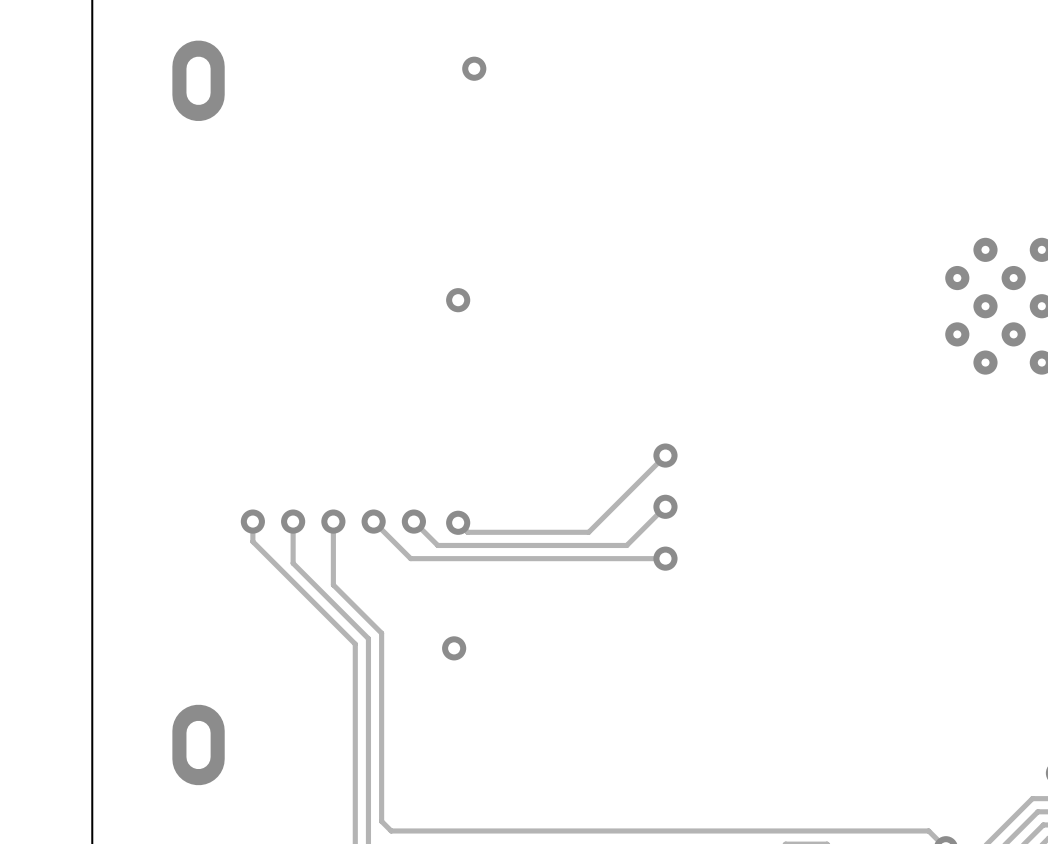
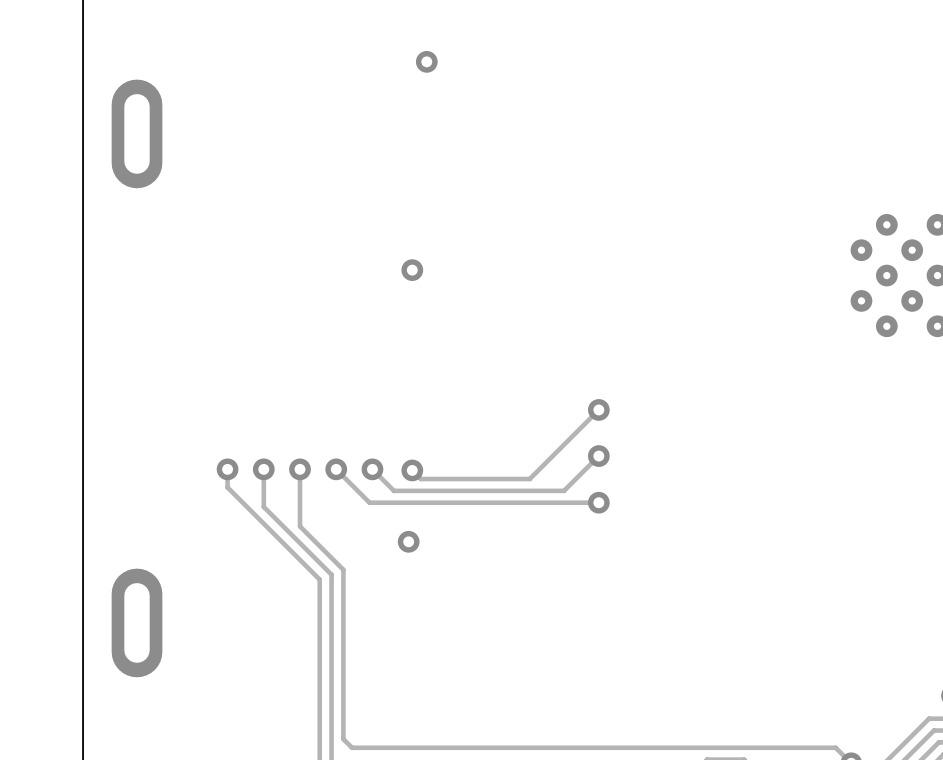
part: (198, 80) -> none
part: none -> (137, 133)
via position: (454, 648) -> (408, 541)
part: none -> (137, 622)
part: (198, 744) -> none

